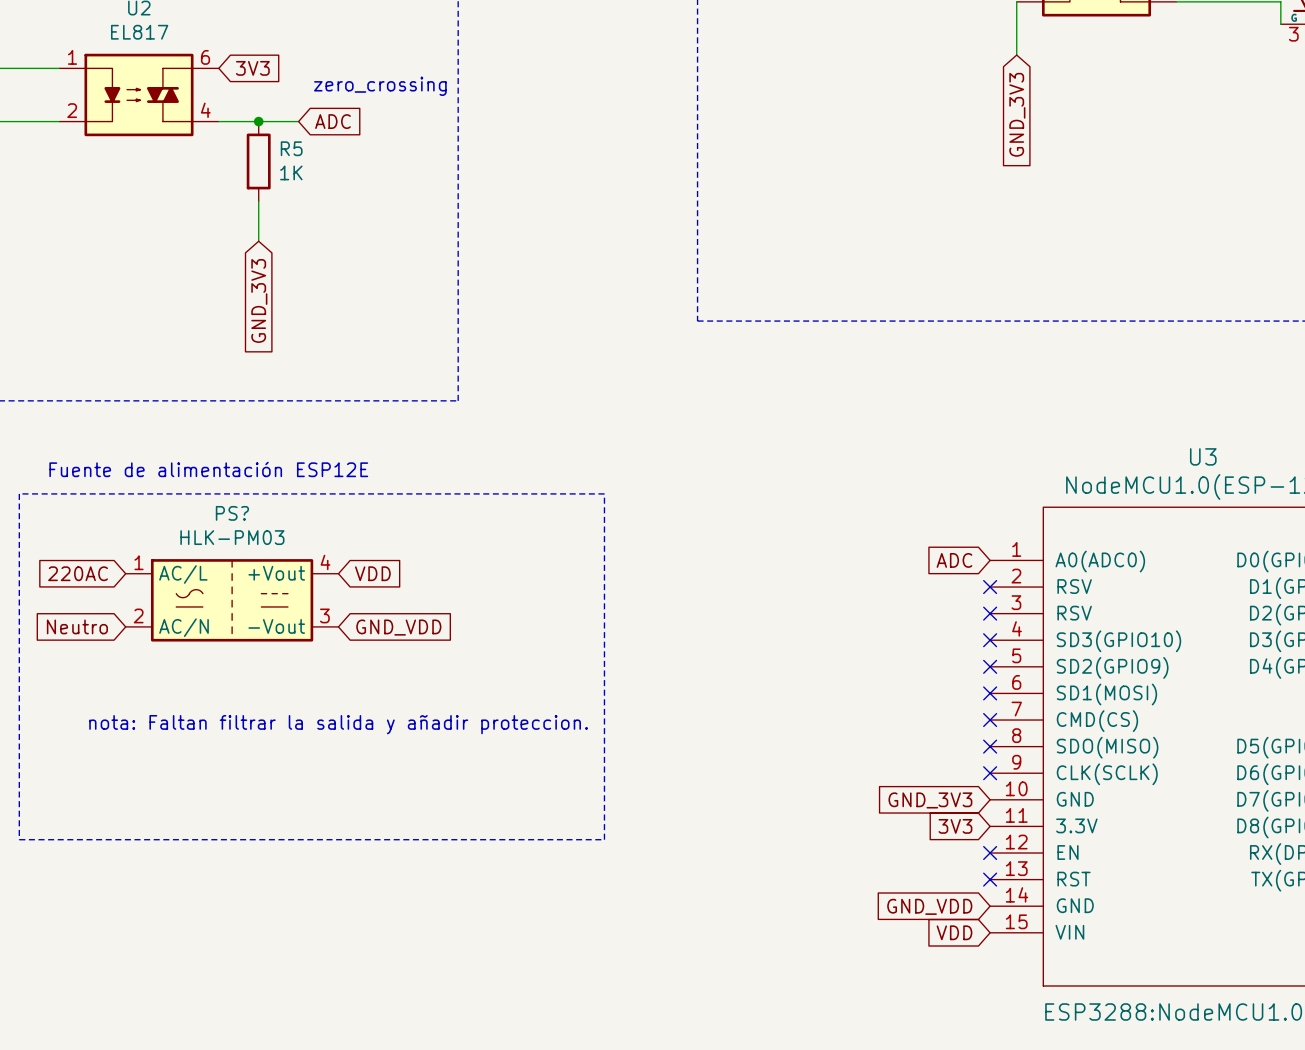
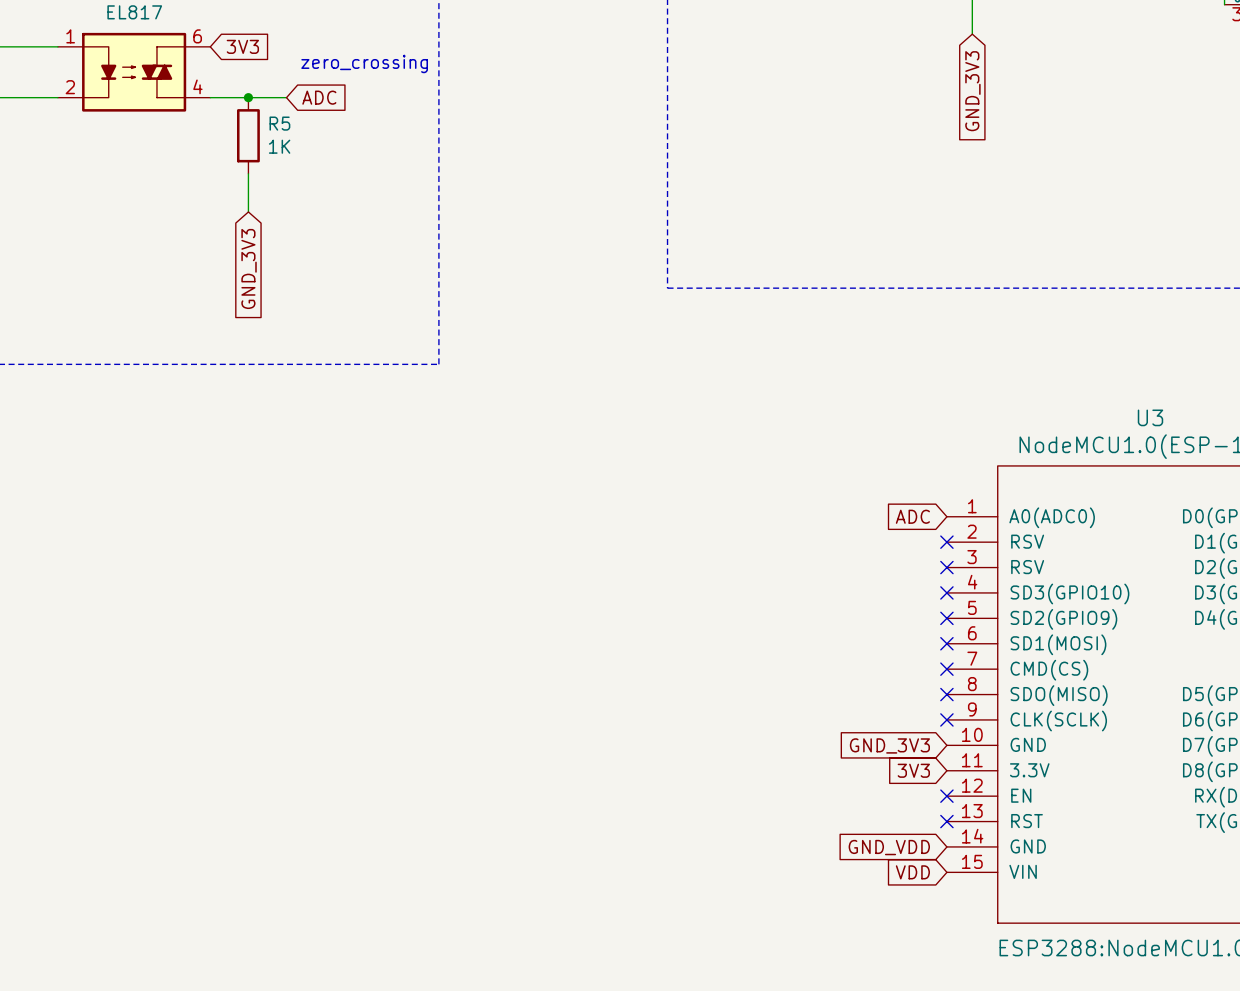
text: Fuente de alimentación ESP12E (208, 469) -> none
line: (19, 493) (19, 839) (604, 839) (604, 493) (19, 493) -> none
global label: 220AC (78, 573) -> none
global label: VDD (372, 573) -> none
PS?: HLK-PM03 (232, 600) -> none
global label: Neutro (77, 626) -> none
global label: GND_VDD (398, 627) -> none
text: nota: Faltan filtrar la salida y añadir proteccion. (338, 724) -> none

